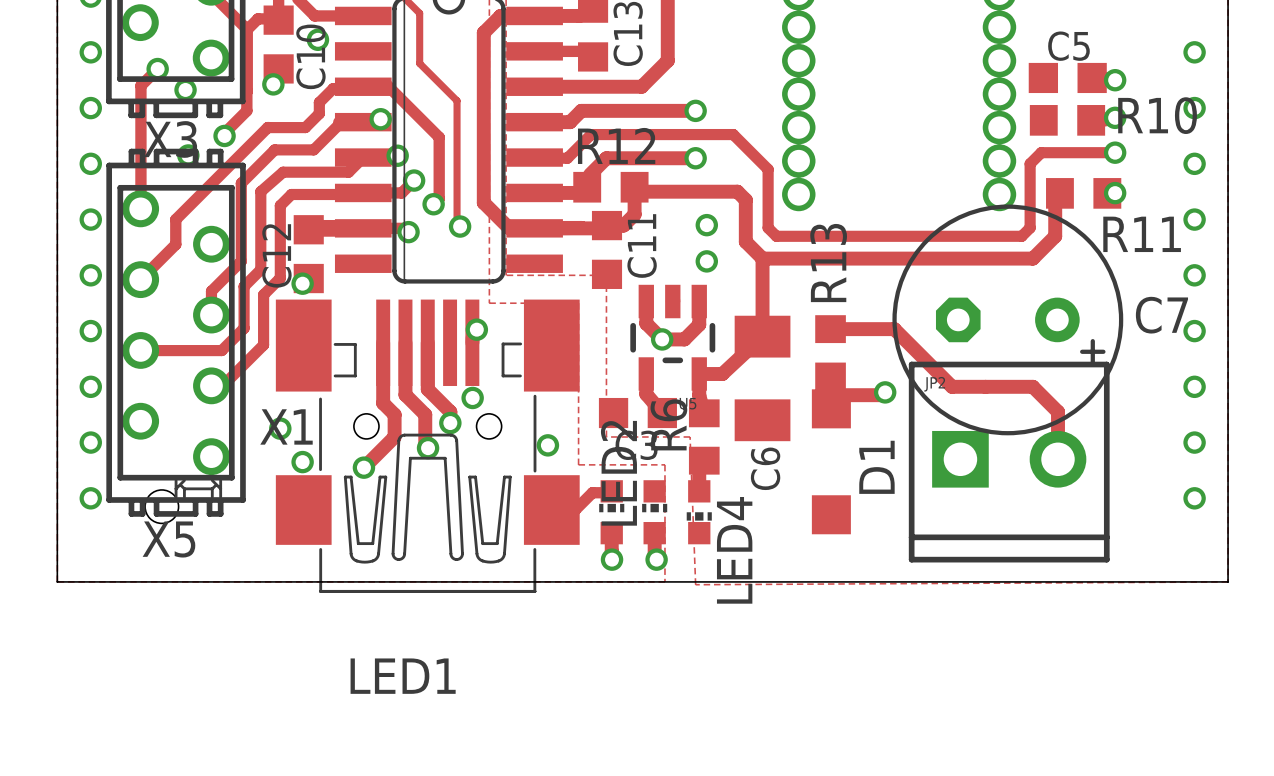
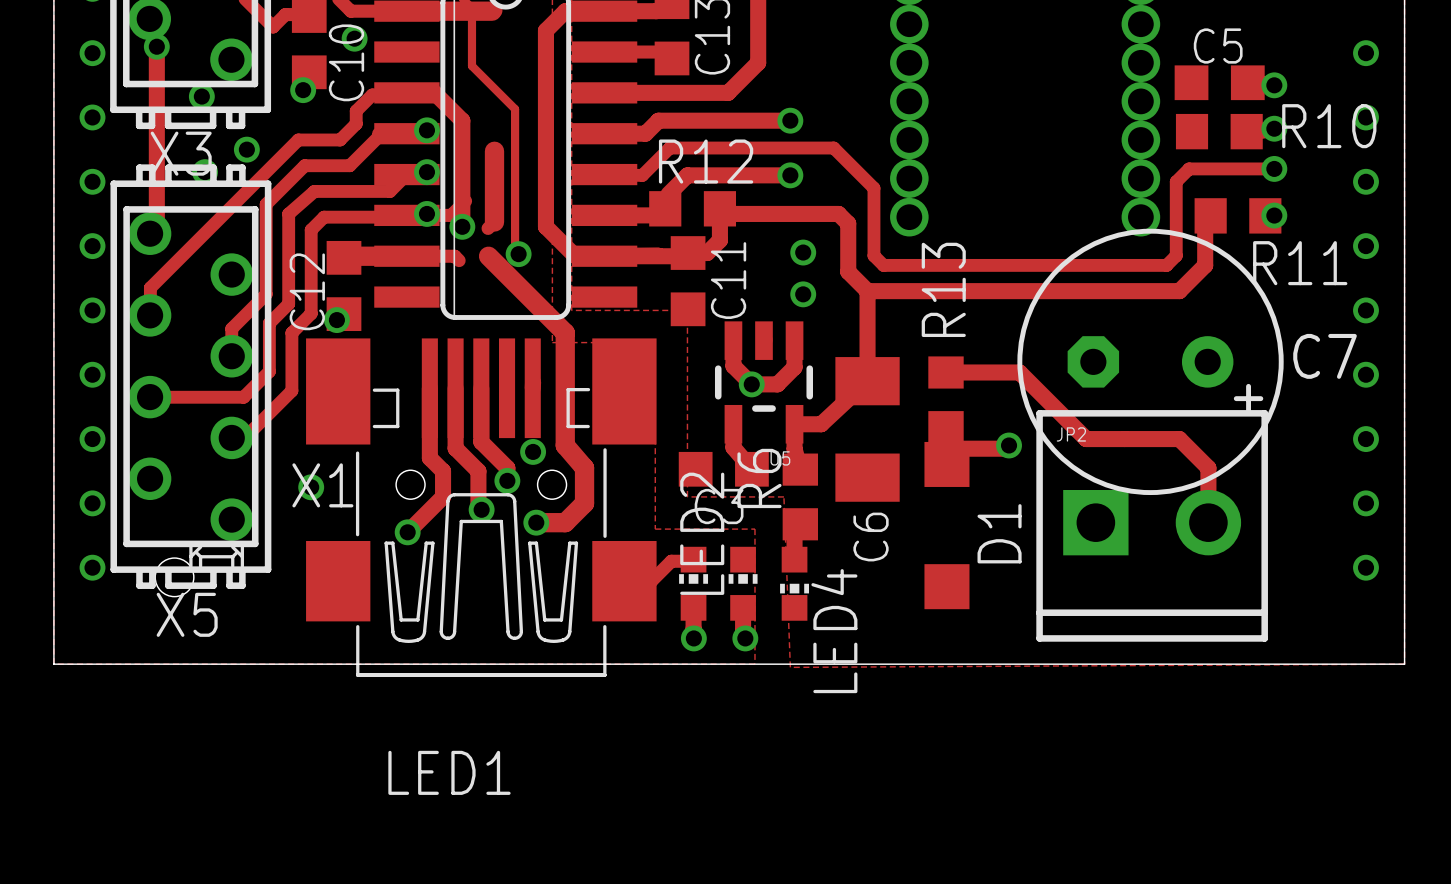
track: none -> (494, 10) (406, 11)
track: (247, 29) (247, 91) -> none
track: (157, 69) (140, 85) (140, 208) -> (156, 46) (156, 226) (150, 233)
via position: (157, 69) -> (156, 46)
track: (386, 85) (439, 137) -> (433, 91) (462, 120) (462, 226)
track: (246, 91) (246, 110) (224, 133) (224, 135) -> none
track: (269, 127) (175, 219) (175, 244) (140, 279) -> (298, 139) (150, 287) (150, 315)
track width: thin (439, 137) (439, 198) -> thick (494, 151) (494, 221)
via position: (397, 155) -> (426, 172)
via: (414, 180) -> none
via: none -> (426, 213)
via: none -> (462, 226)
via: (433, 204) -> none
track: none -> (488, 256) (565, 332) (565, 445) (584, 468) (584, 503) (565, 522) (536, 522)
via: (408, 232) -> none
via: (476, 329) -> none
via: (547, 445) -> none
via: none -> (536, 522)
via: (302, 462) -> none

